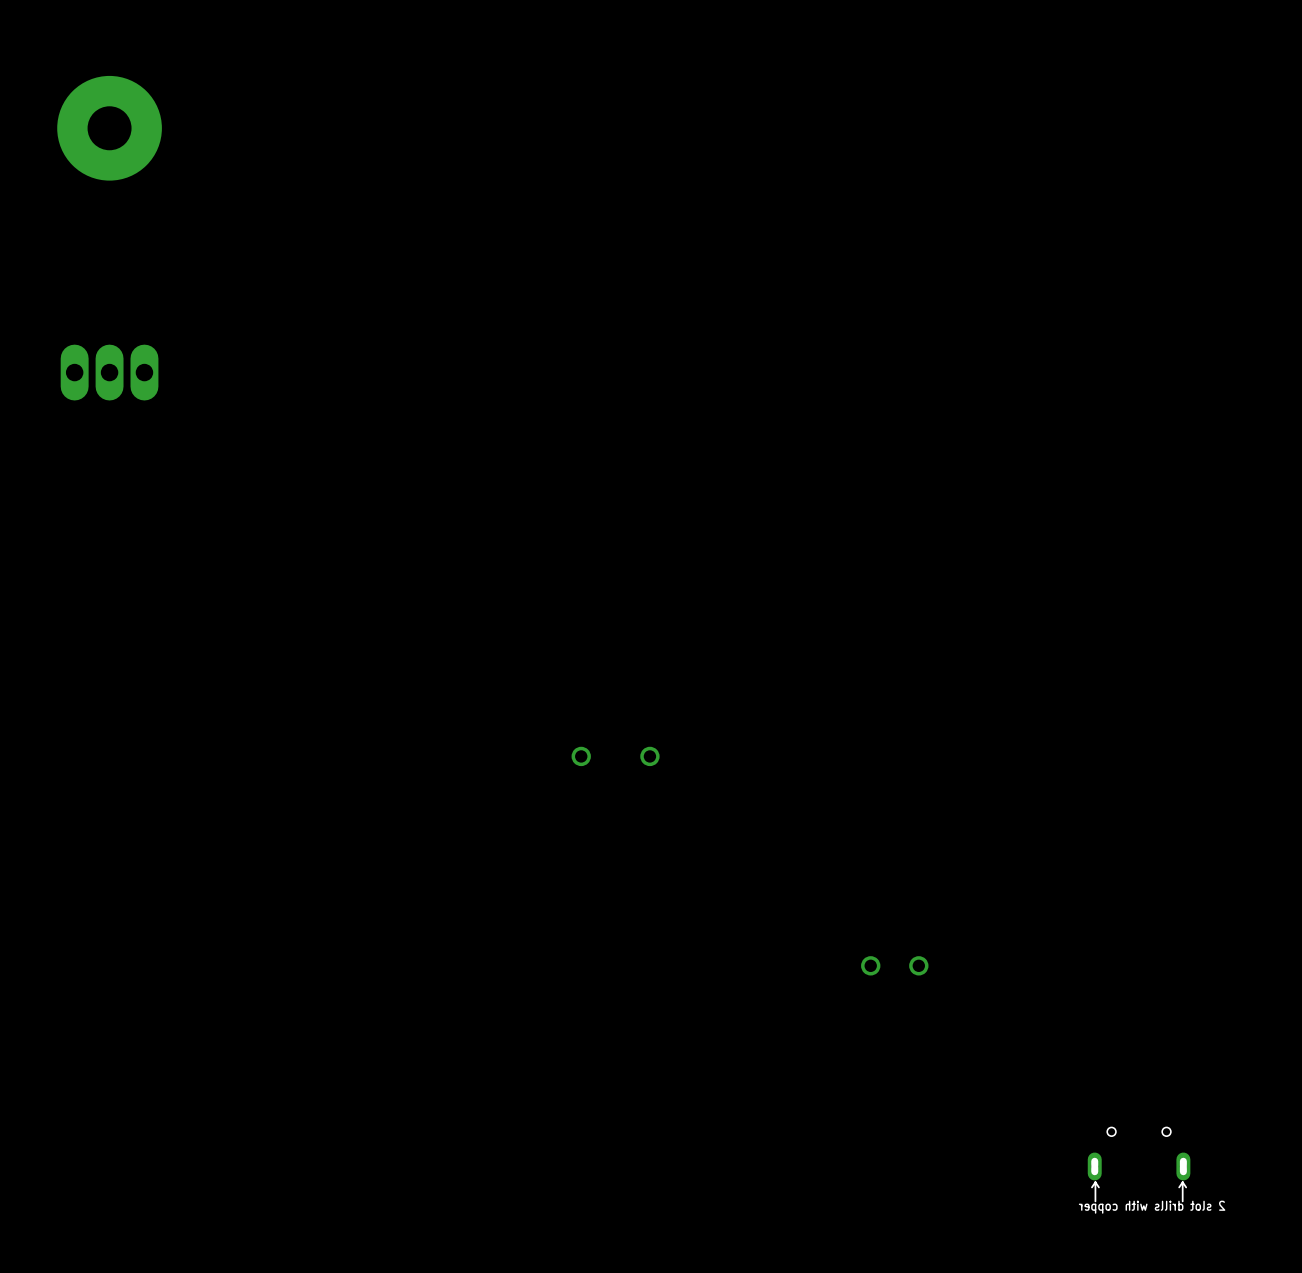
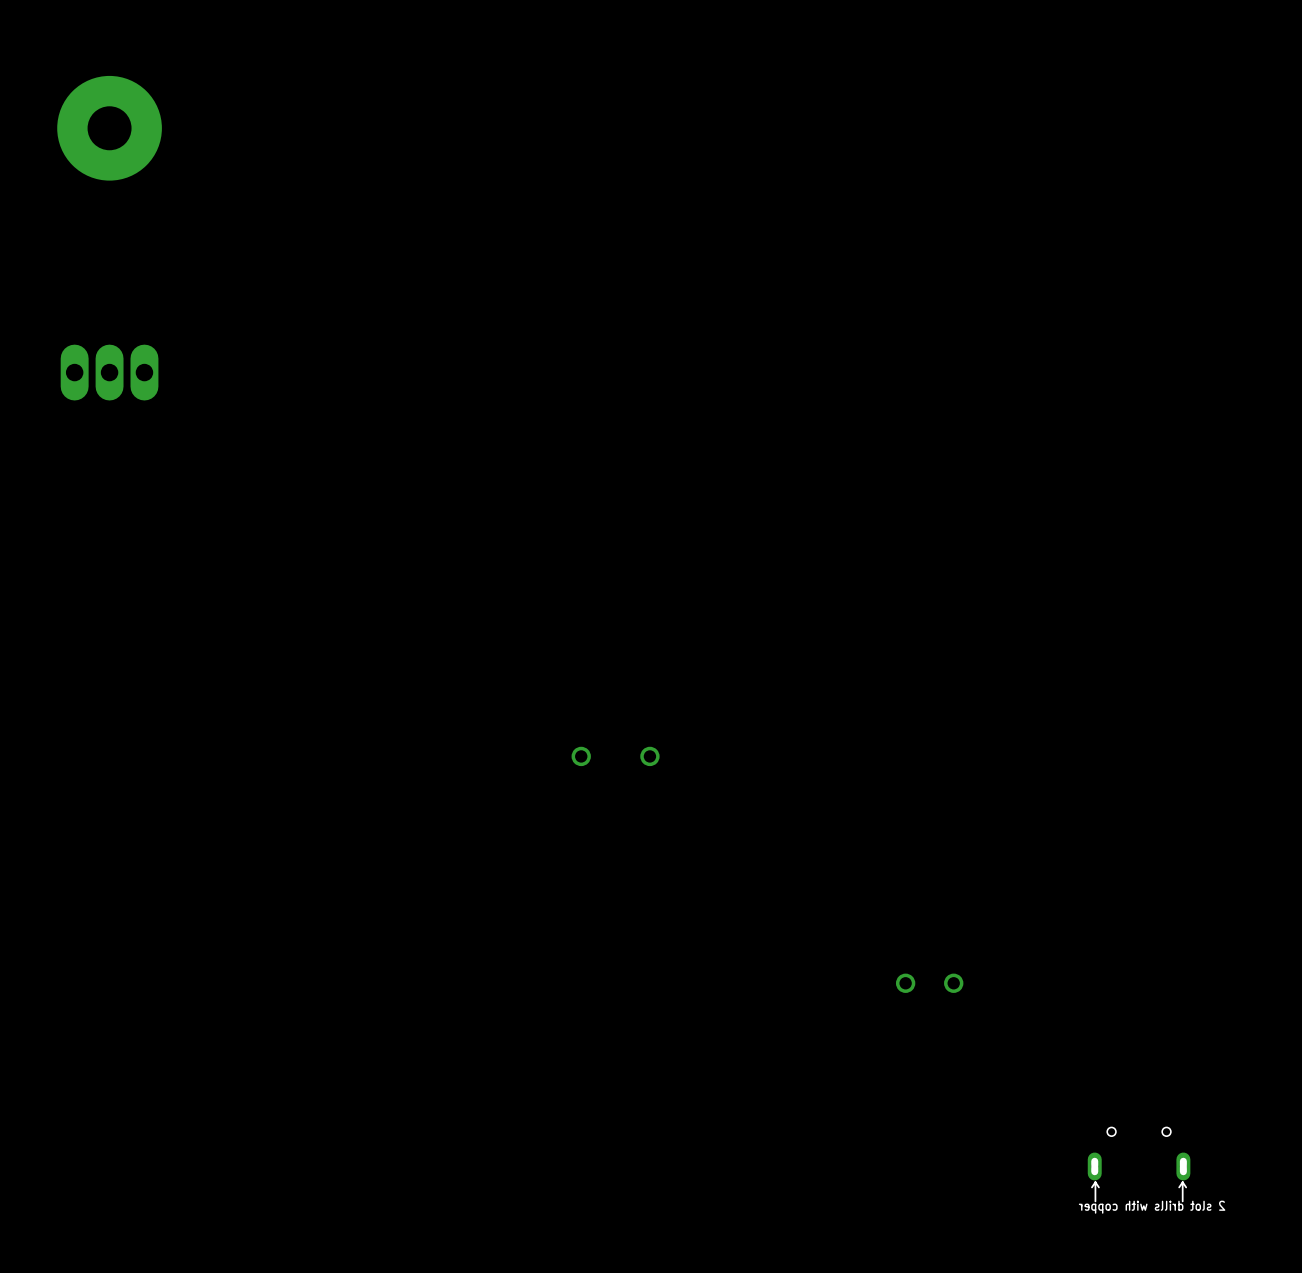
part position: (894, 965) -> (929, 983)

